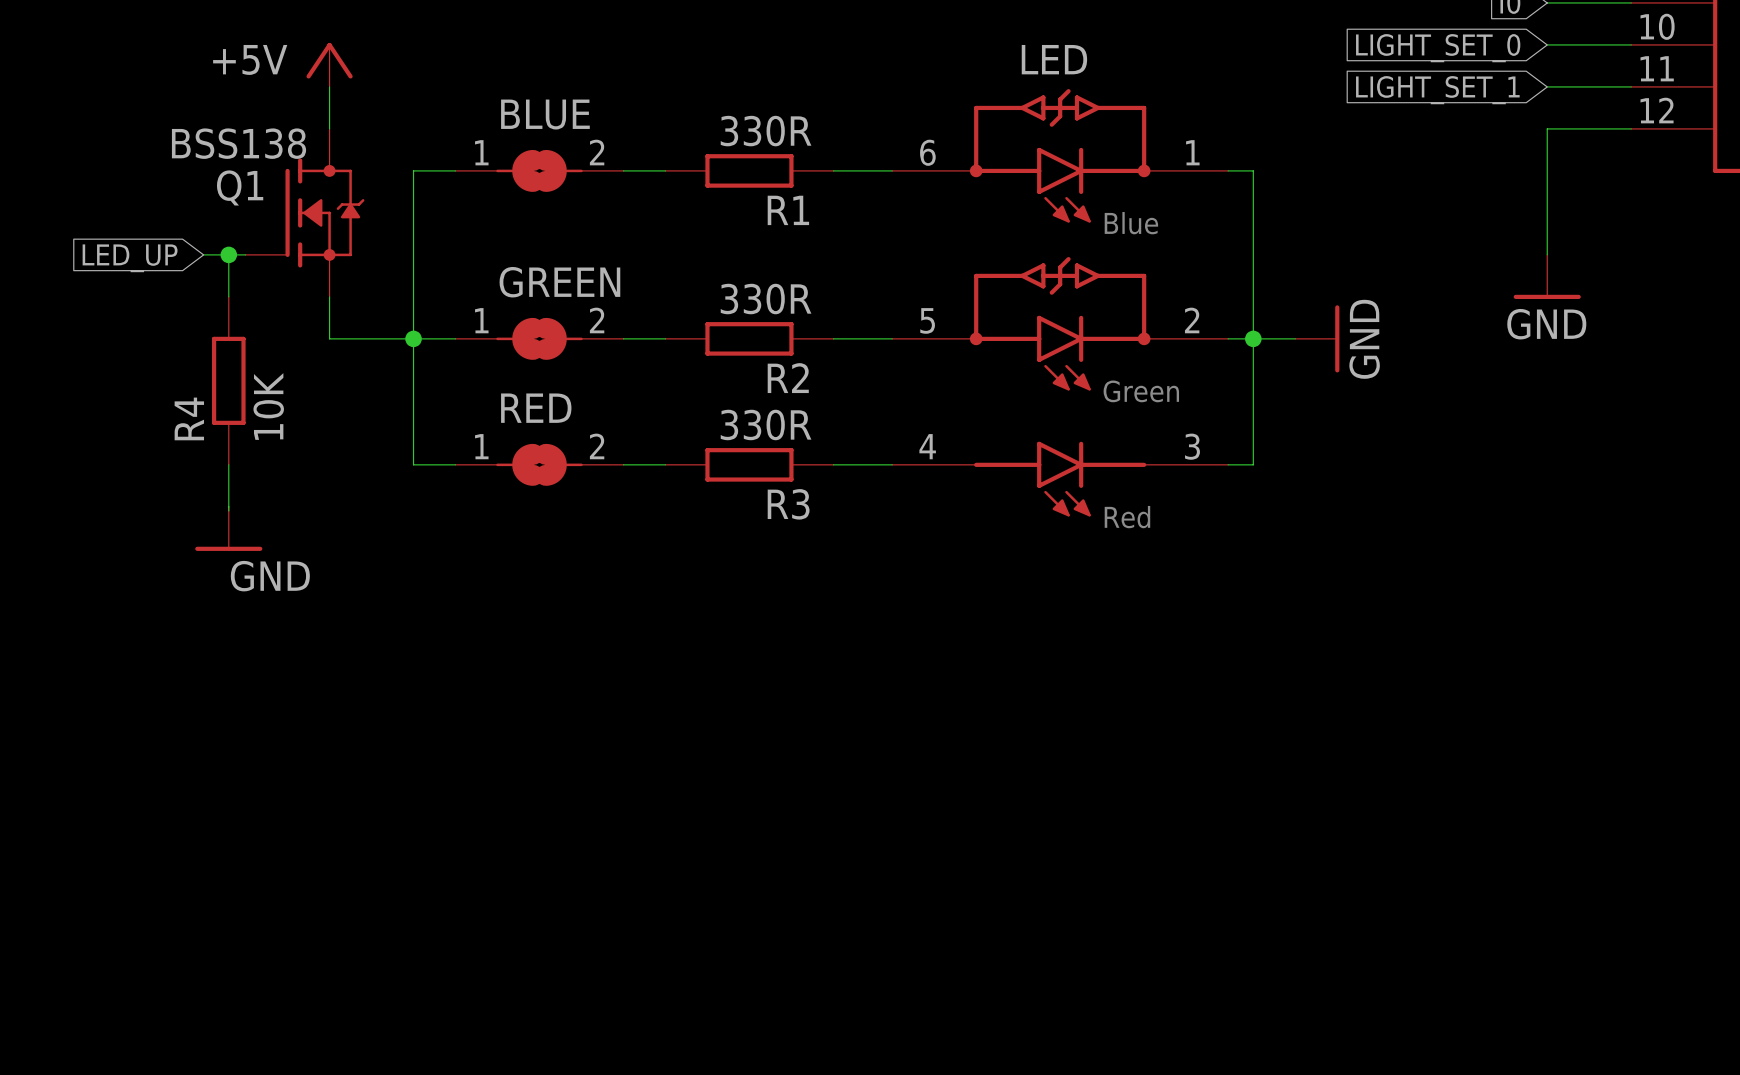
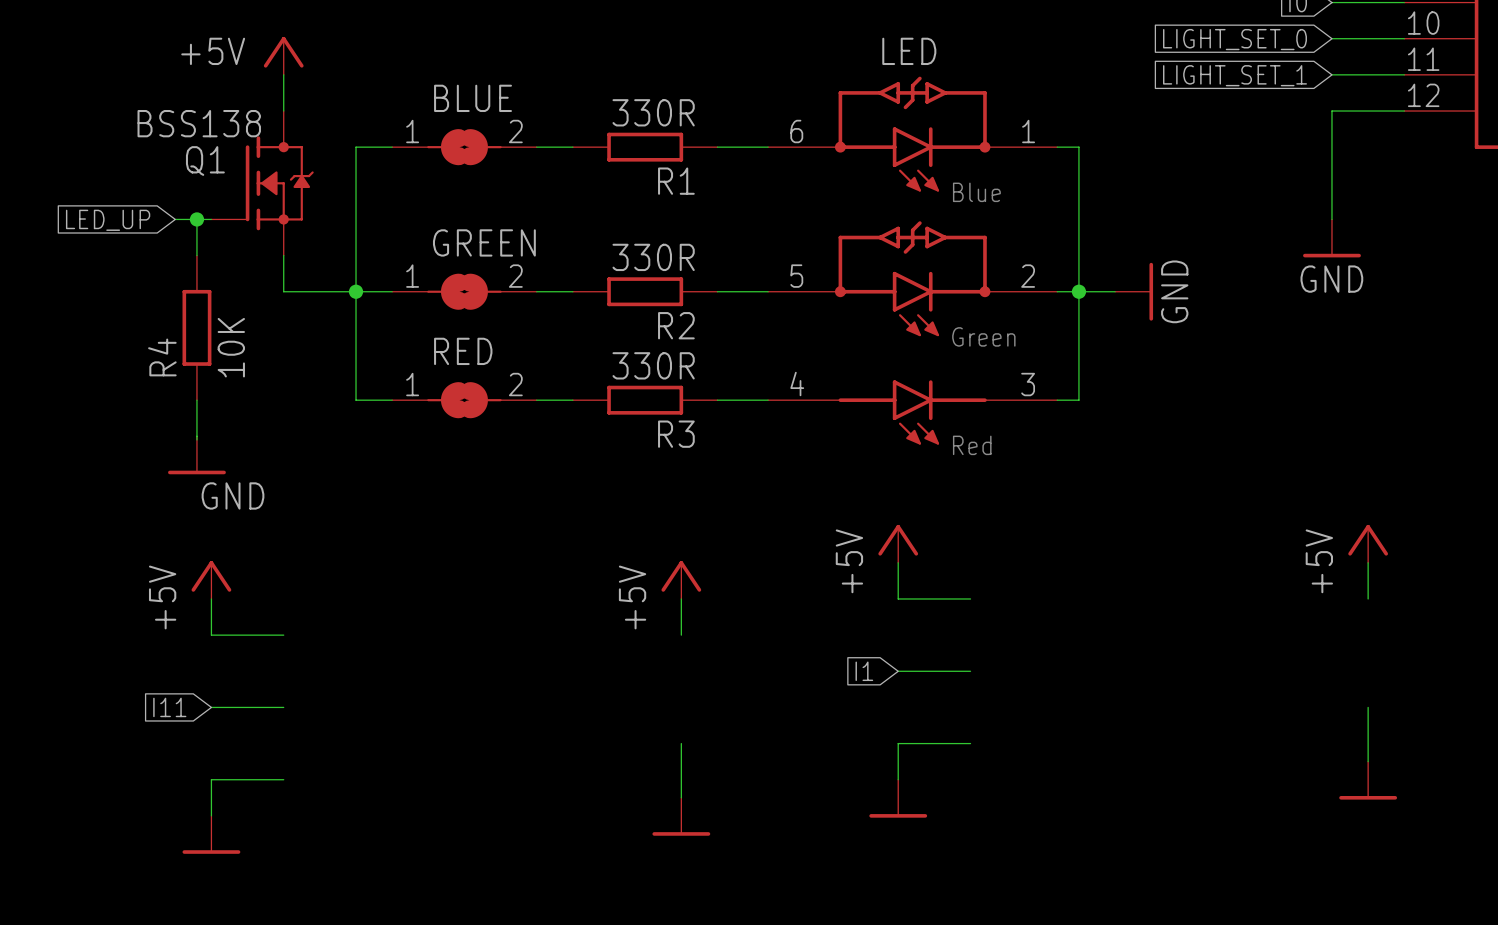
power symbol: none -> +5V (898, 543)
power symbol: none -> +5V (1368, 543)
wire: none -> (898, 562) (898, 598) (970, 598)
wire: none -> (1368, 562) (1368, 598)
power symbol: none -> +5V (211, 580)
power symbol: none -> +5V (681, 580)
wire: none -> (211, 598) (211, 635) (283, 635)
wire: none -> (681, 598) (681, 635)
global label: none -> I1 (864, 671)
wire: none -> (898, 671) (970, 671)
global label: none -> I11 (169, 707)
wire: none -> (211, 707) (283, 707)
wire: none -> (1368, 707) (1368, 761)
wire: none -> (681, 743) (681, 797)
wire: none -> (970, 743) (898, 743) (898, 779)
wire: none -> (283, 779) (211, 779) (211, 815)
power symbol: none -> (1368, 780)
power symbol: none -> (898, 798)
power symbol: none -> (681, 816)
power symbol: none -> (211, 834)

